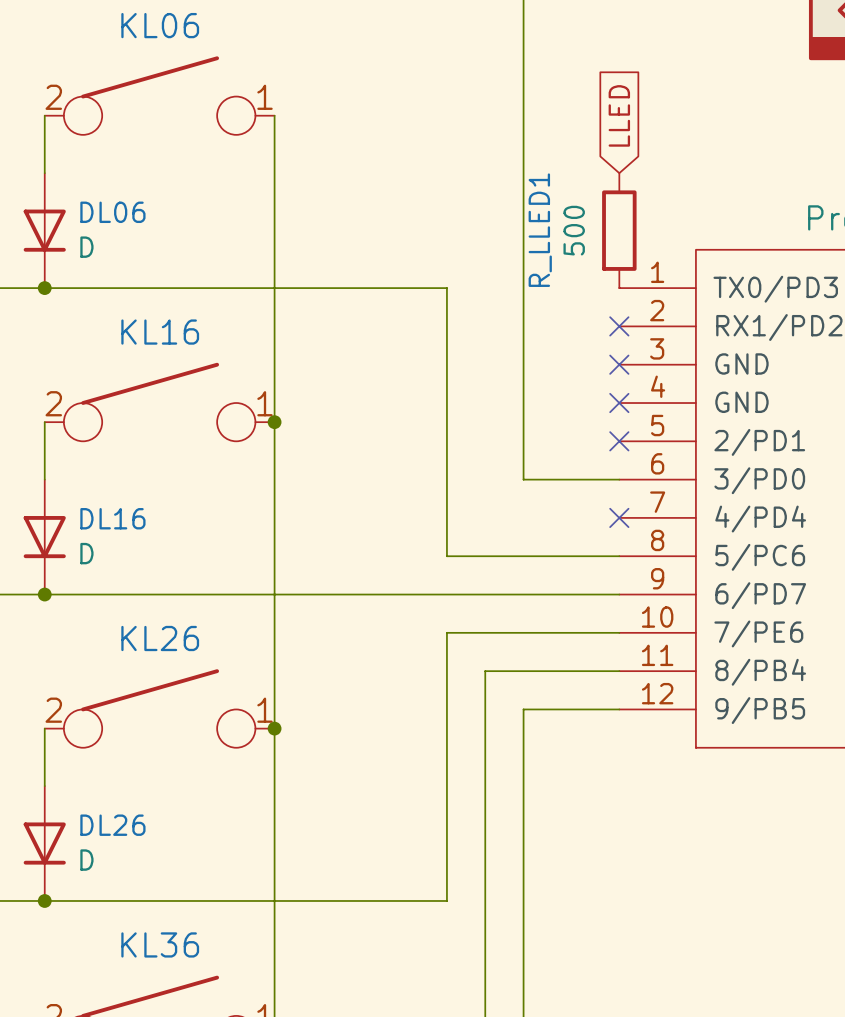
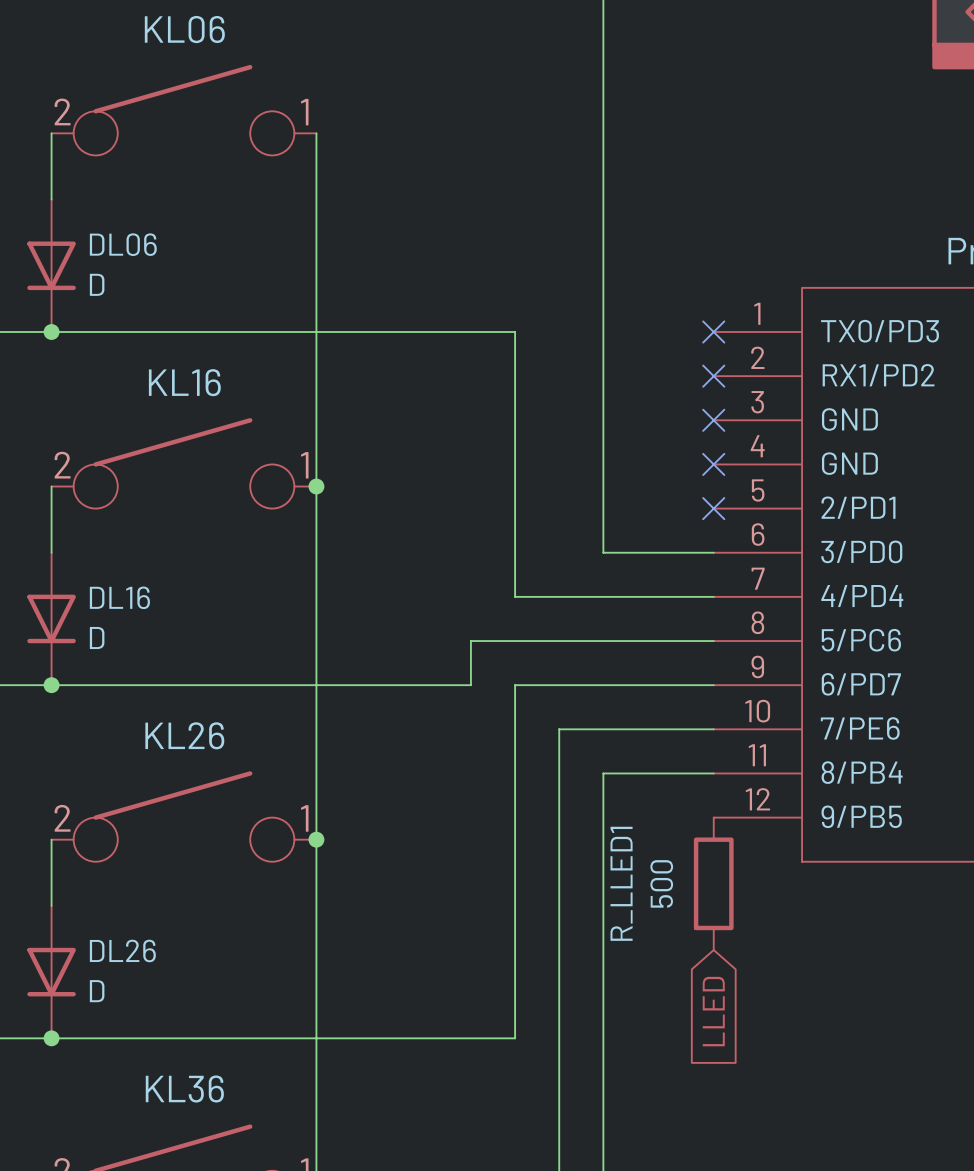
global label: LLED (619, 115) -> none
R_LLED1 position: (619, 230) -> (713, 883)
no-connect mark: none -> (713, 332)
wire: (446, 517) (446, 556) -> (515, 596) (713, 596)
no-connect mark: (619, 517) -> none
wire: (408, 594) (446, 594) -> (470, 685) (470, 641) (515, 641)
wire: none -> (515, 685) (515, 729)
wire: (446, 632) (485, 632) -> (559, 773) (559, 729)
wire: (485, 671) (523, 671) -> (603, 817) (603, 773)
wire: (523, 709) (619, 709) -> none
global label: none -> LLED (713, 1011)

